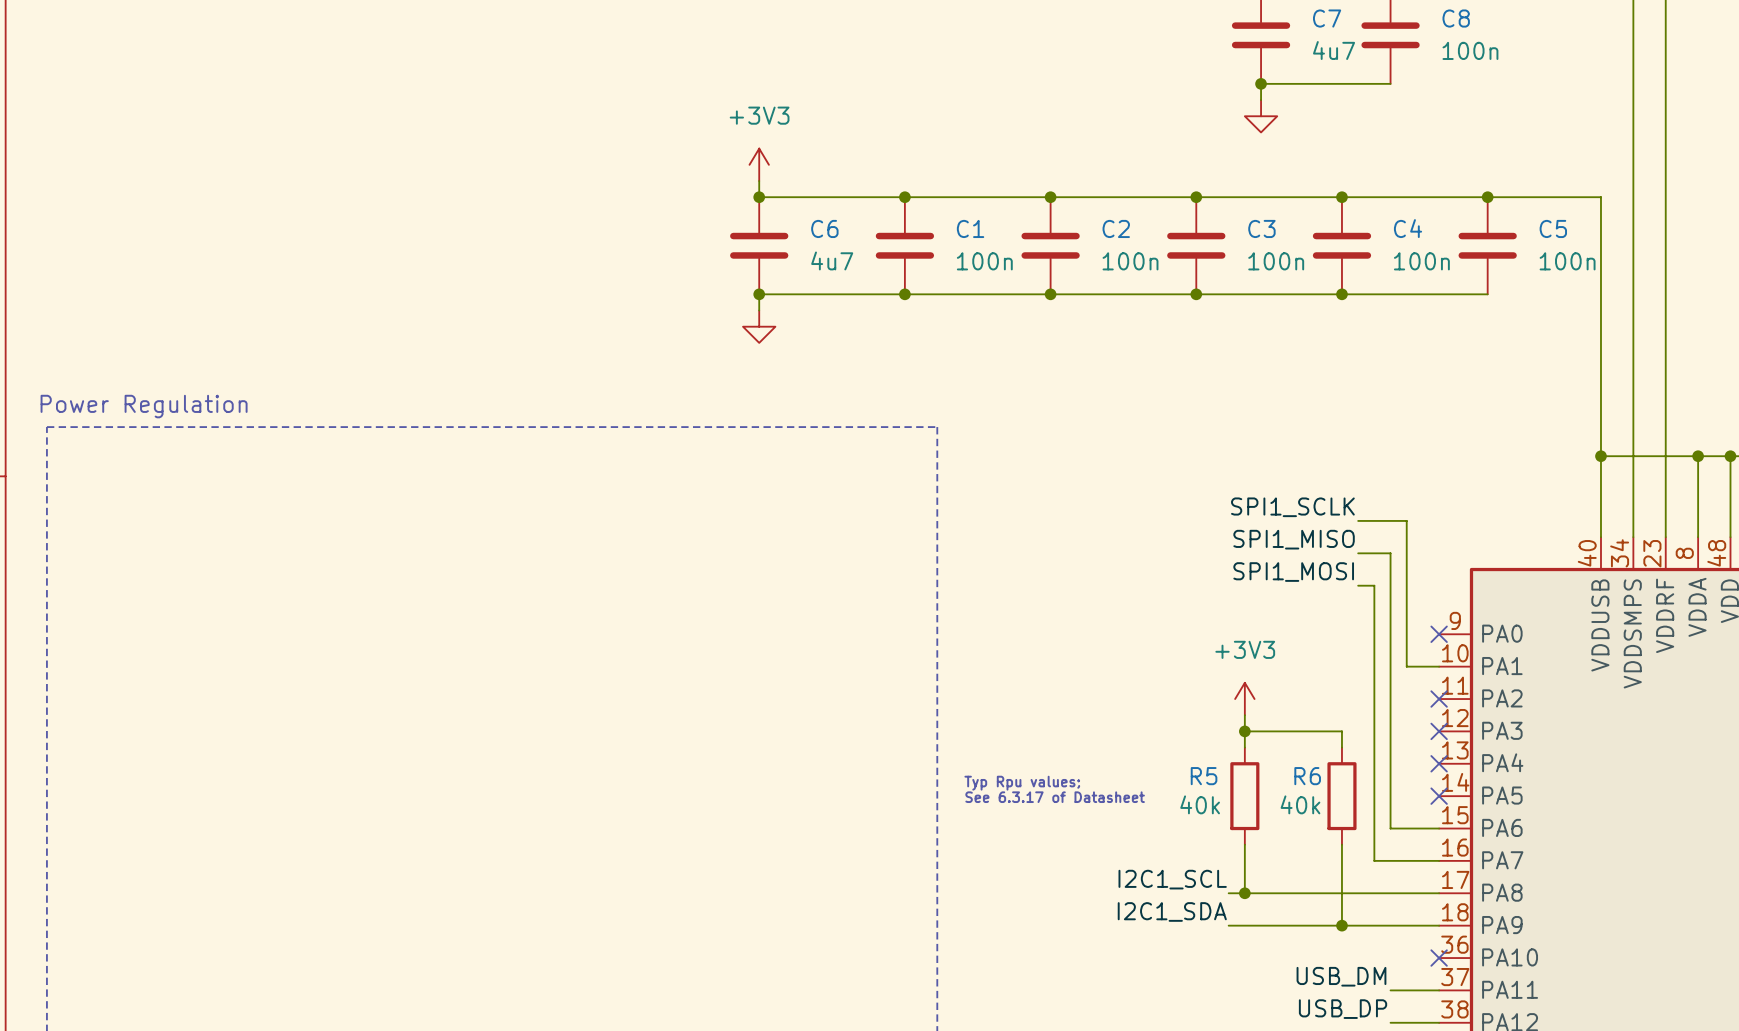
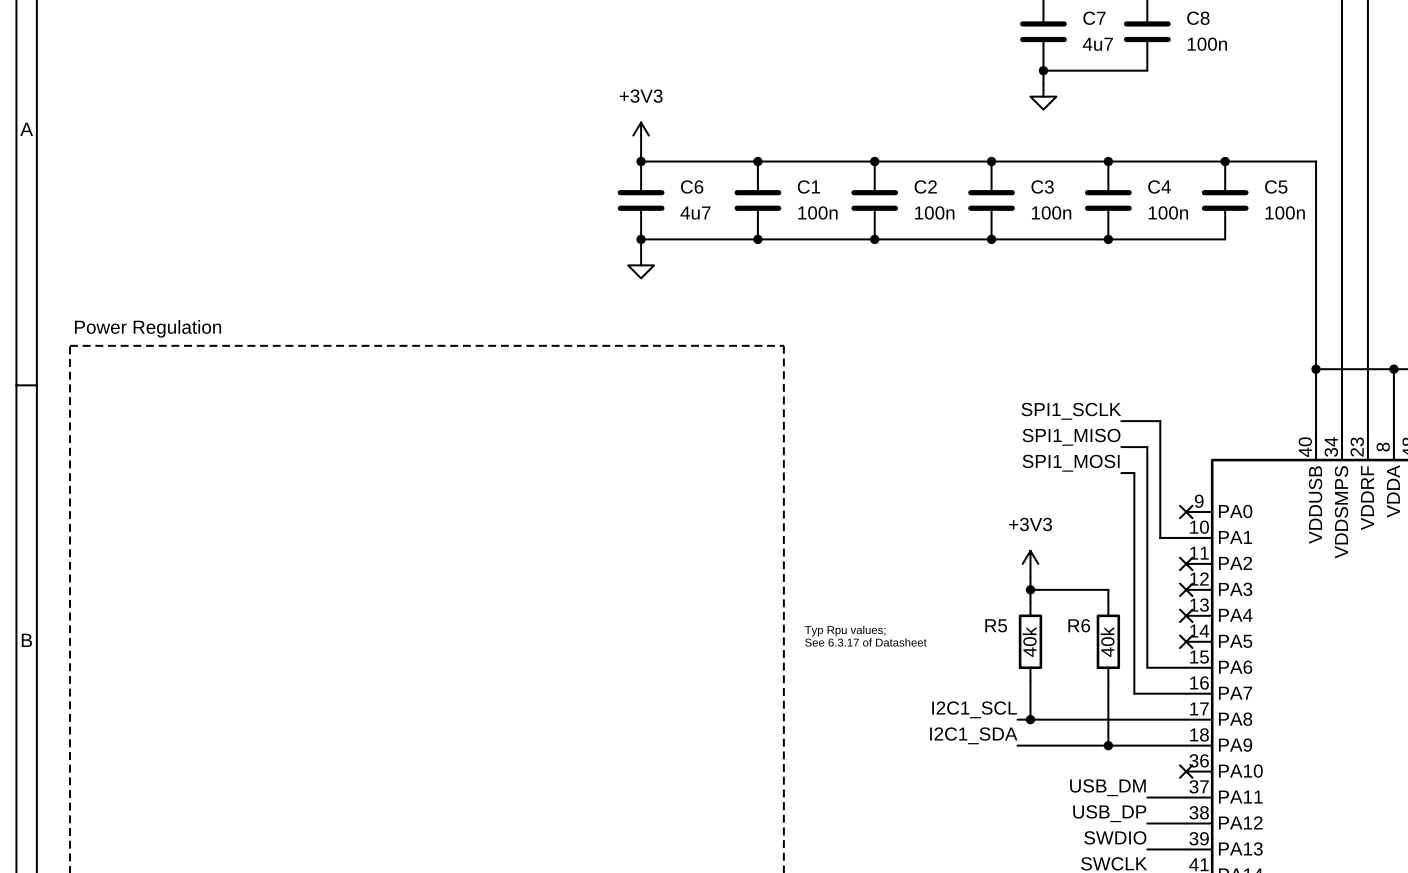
R5 value rotation: 0° (1200, 804) -> 90° counterclockwise (1029, 641)
R6 value rotation: 0° (1300, 804) -> 90° counterclockwise (1107, 641)

